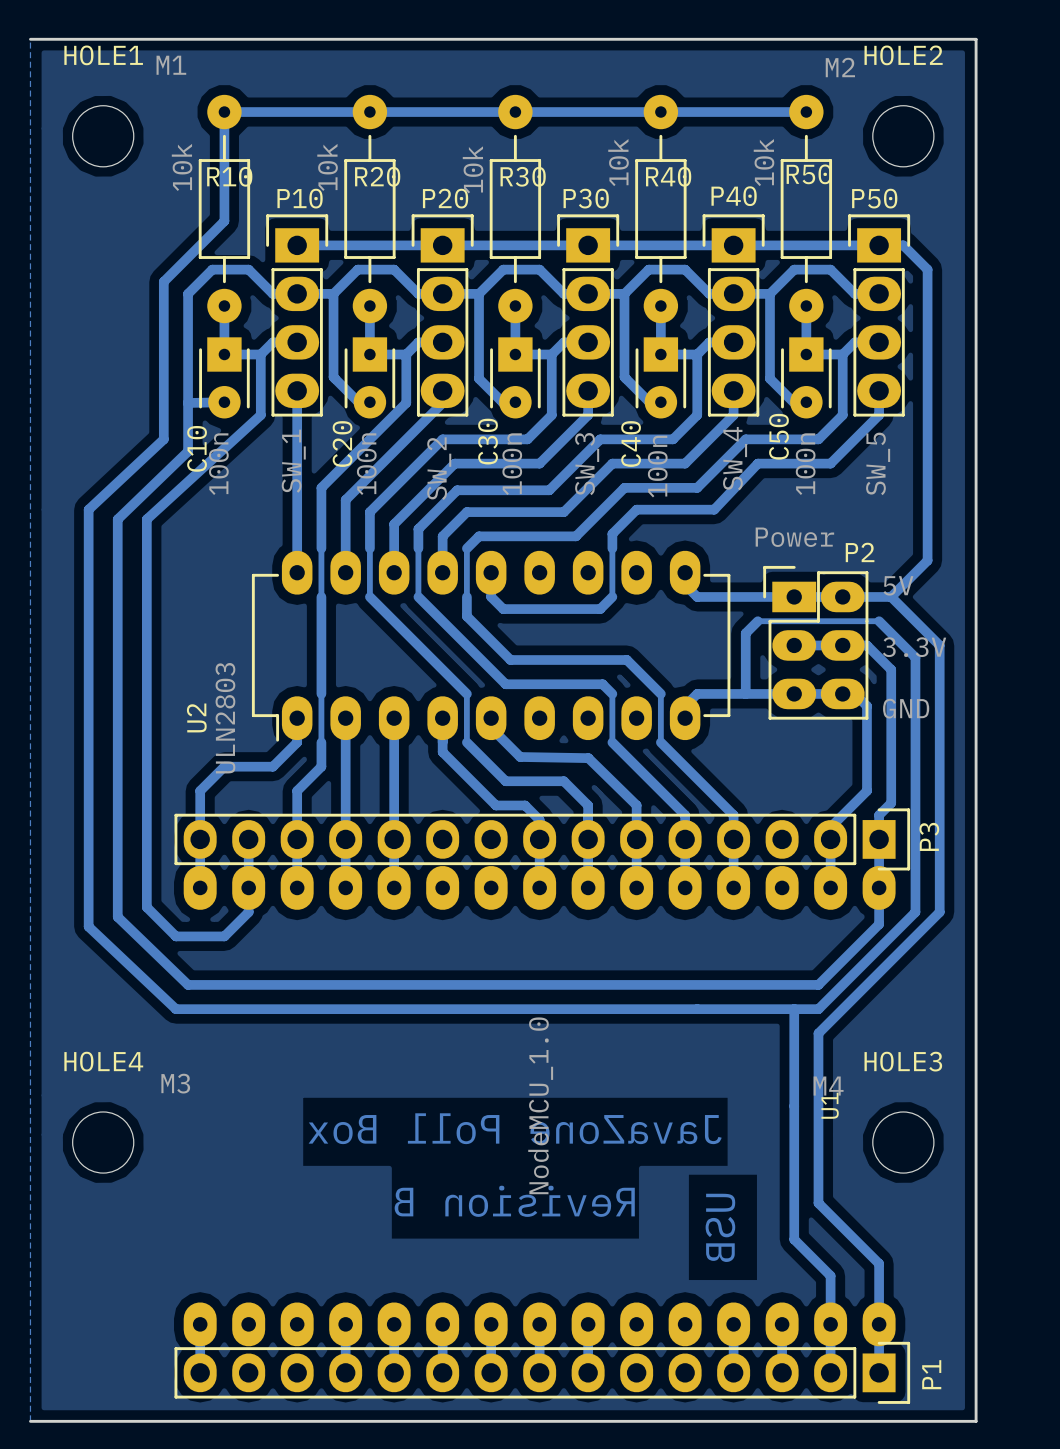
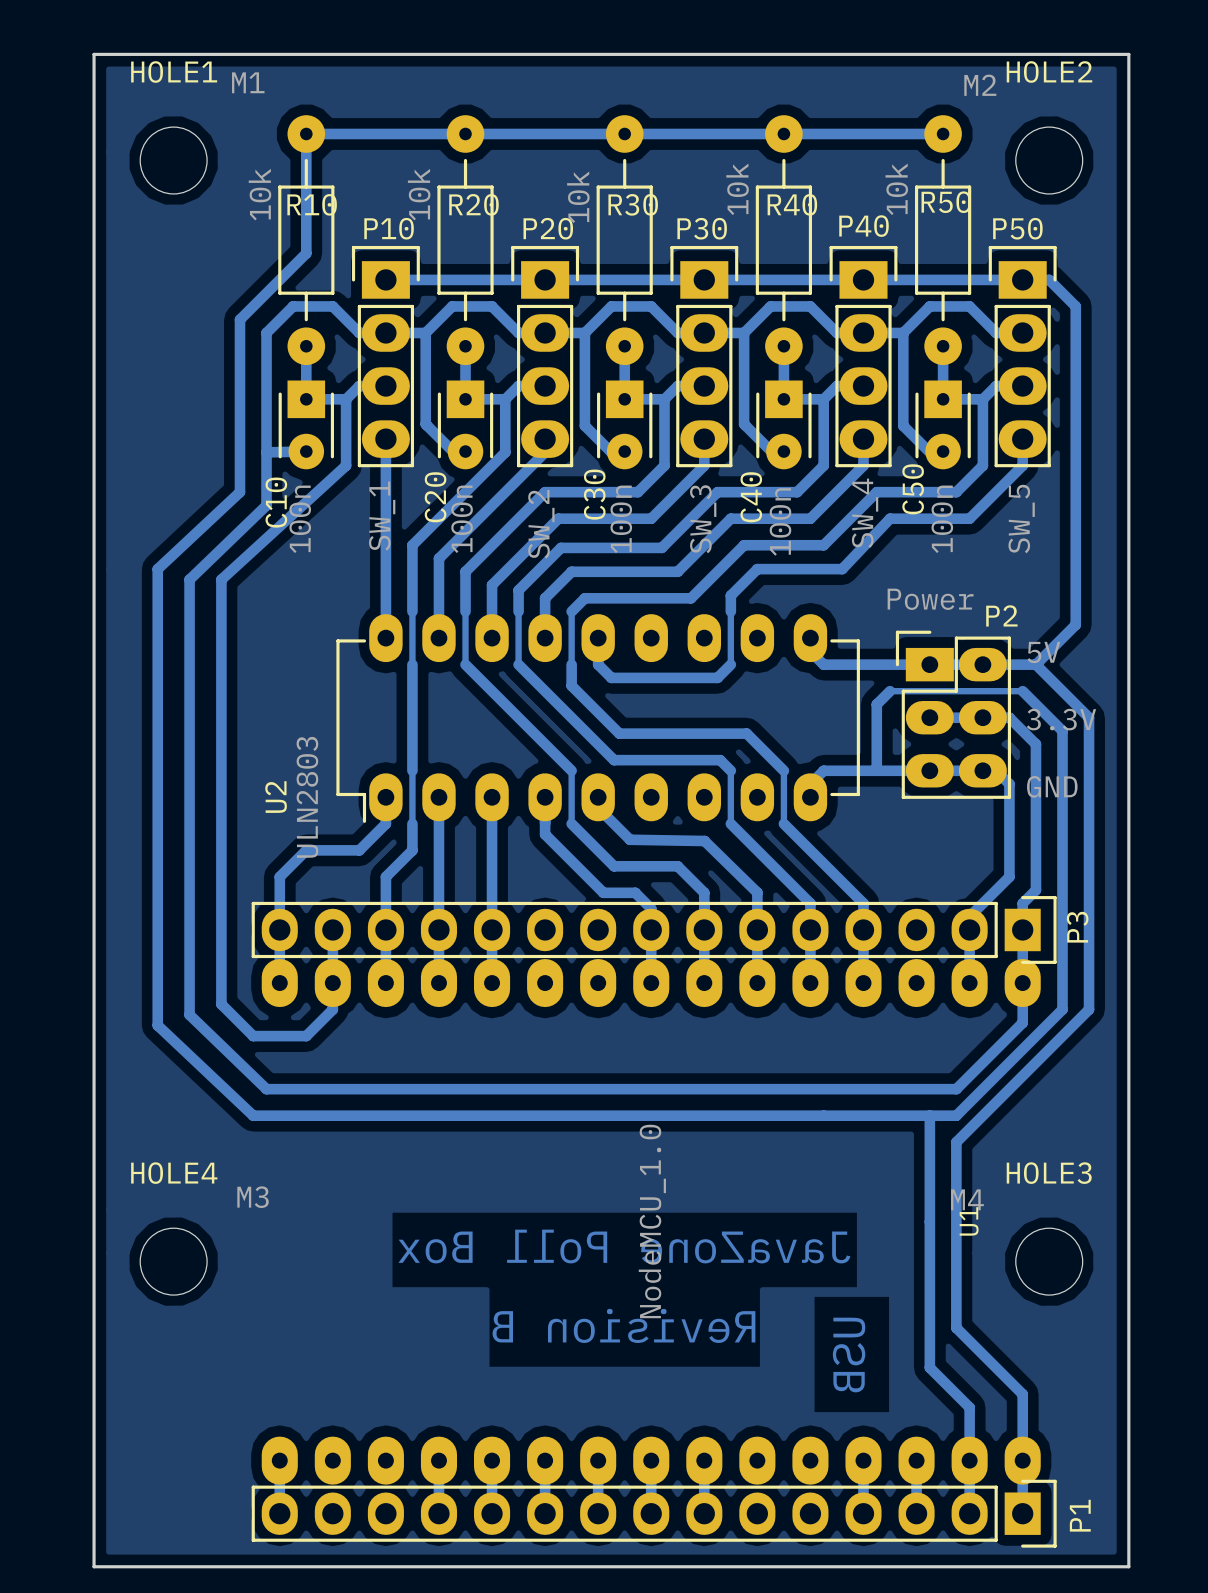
board edge: none -> (94, 54) (94, 1566)

